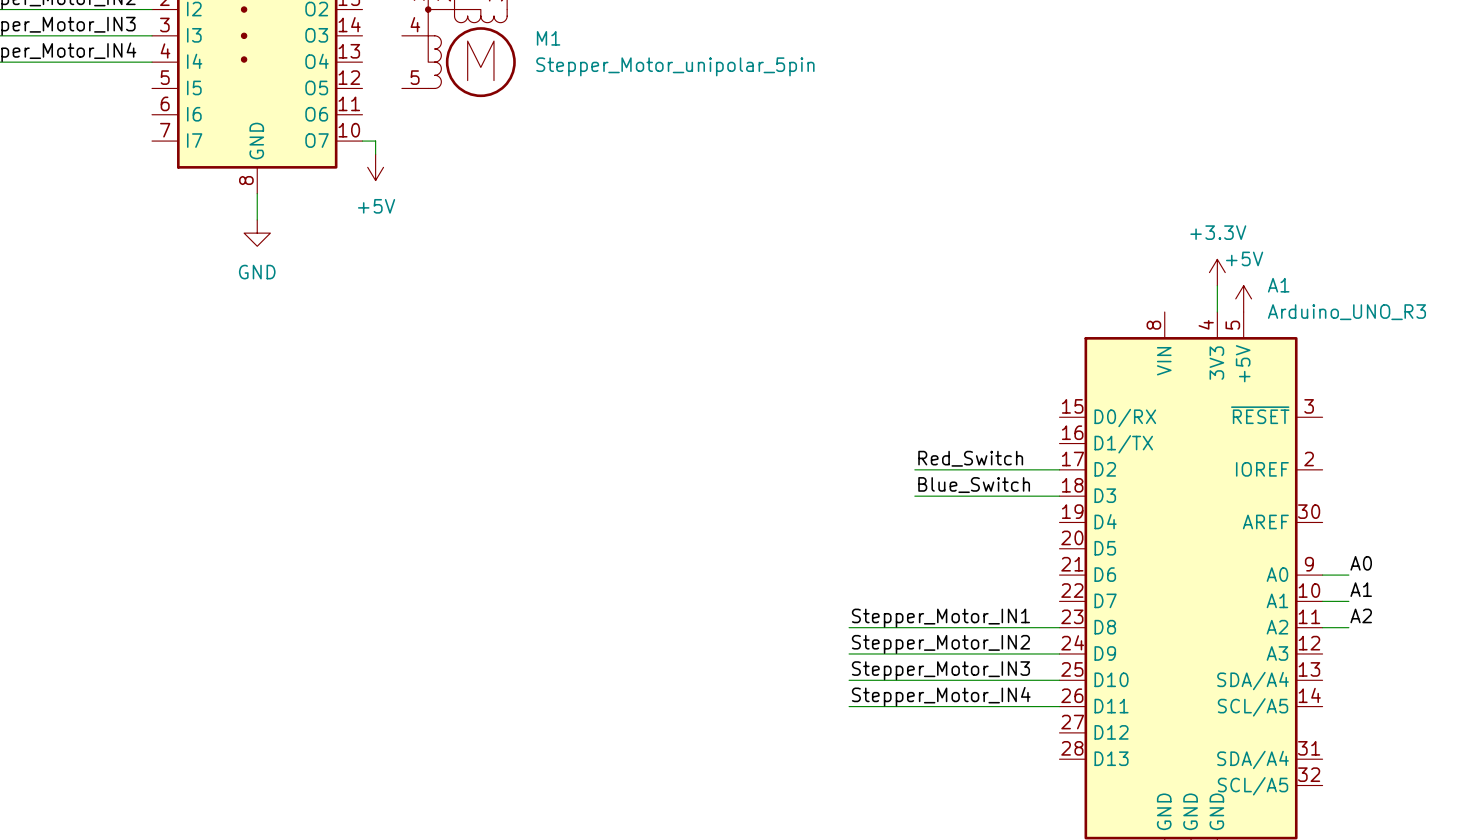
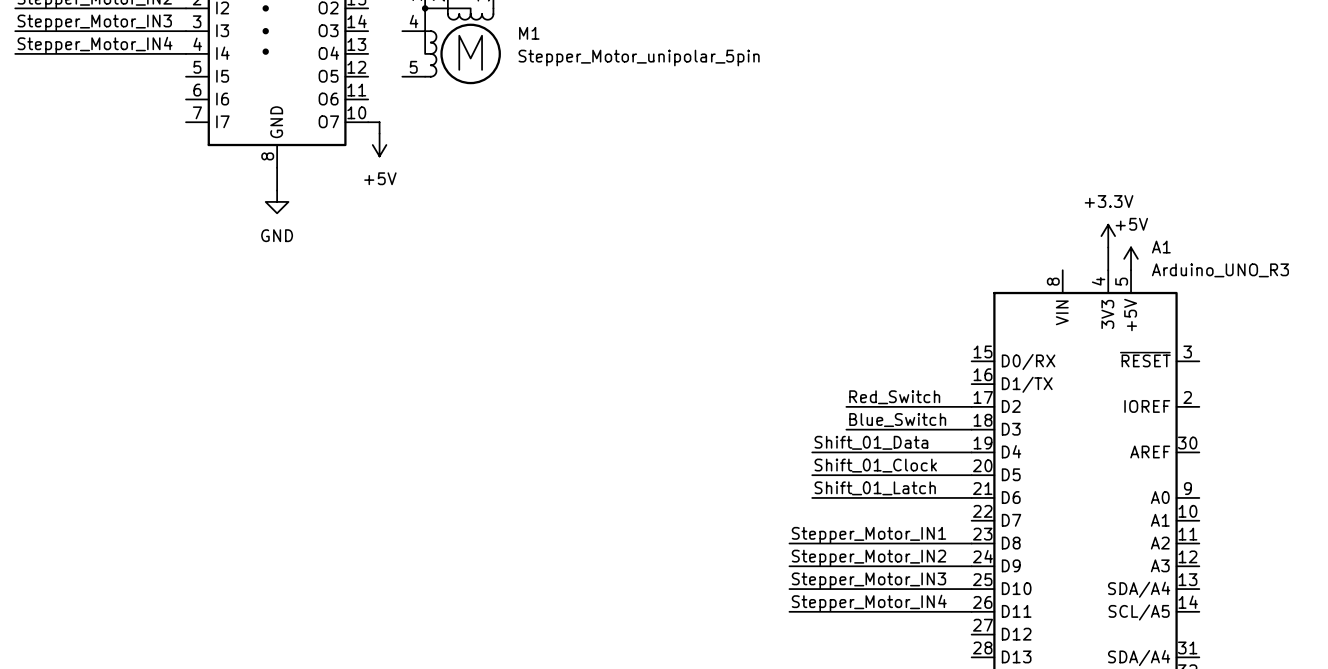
label: none -> Shift_01_Data (871, 442)
wire: none -> (812, 452) (971, 452)
label: none -> Shift_01_Clock (875, 465)
wire: none -> (812, 475) (971, 475)
label: none -> Shift_01_Latch (875, 488)
label: A0 (1361, 563) -> none
wire: none -> (812, 497) (971, 497)
wire: (1322, 575) (1348, 575) -> none
label: A1 (1361, 589) -> none
wire: (1322, 601) (1348, 601) -> none
label: A2 (1361, 615) -> none
wire: (1322, 627) (1348, 627) -> none

